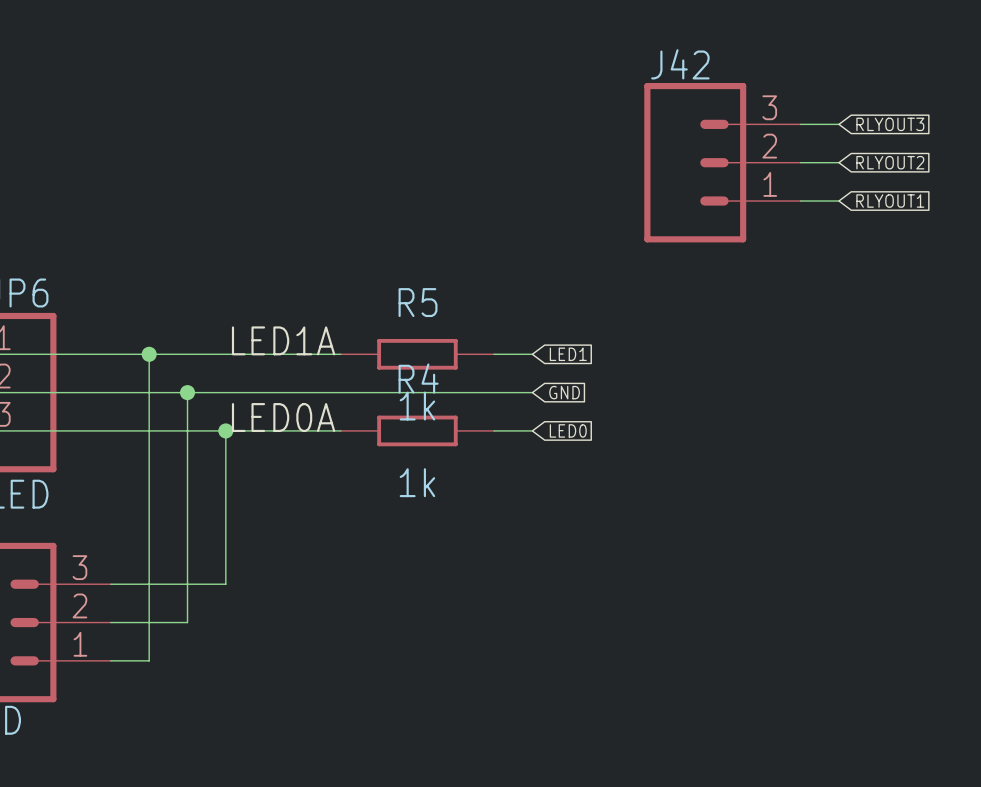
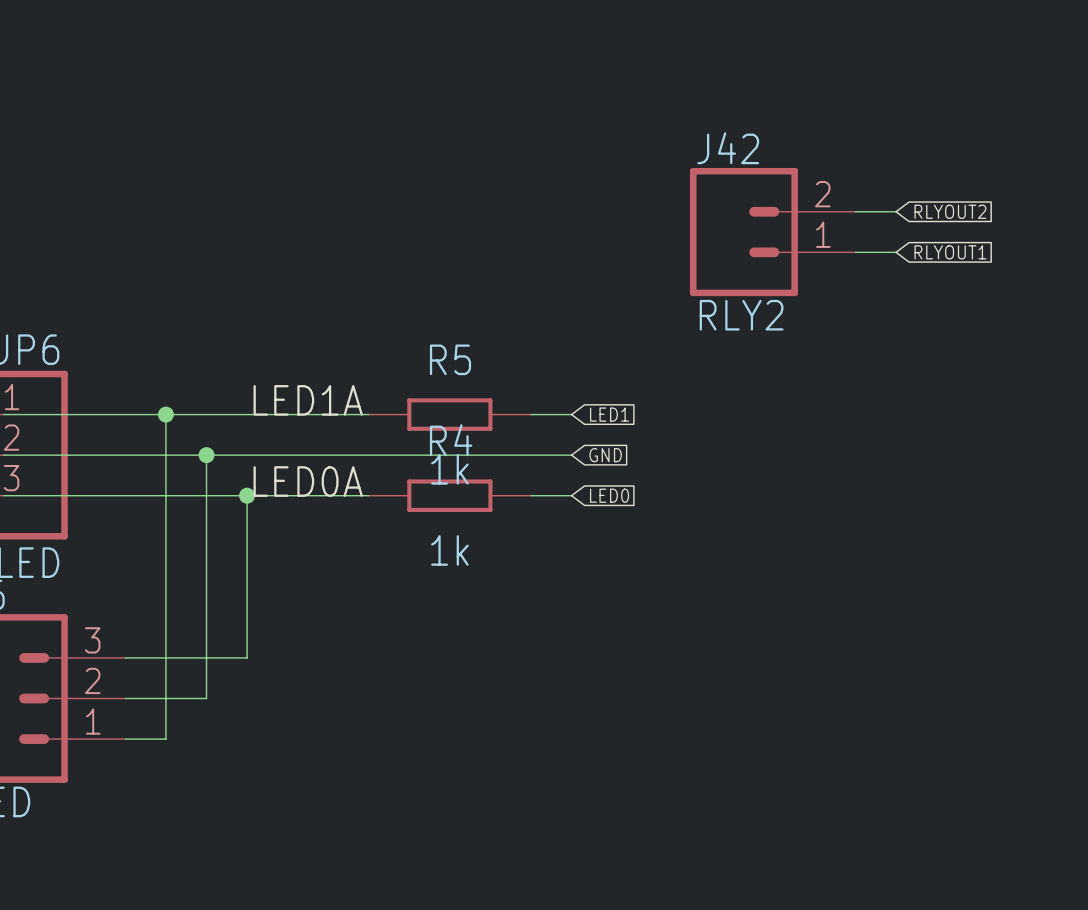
J42 symbol: [644, 82, 801, 243] -> [690, 167, 856, 297]
wire: (800, 124) (838, 124) -> none
global label: RLYOUT3 (890, 124) -> none
J42 value: none -> RLY2 (741, 315)

